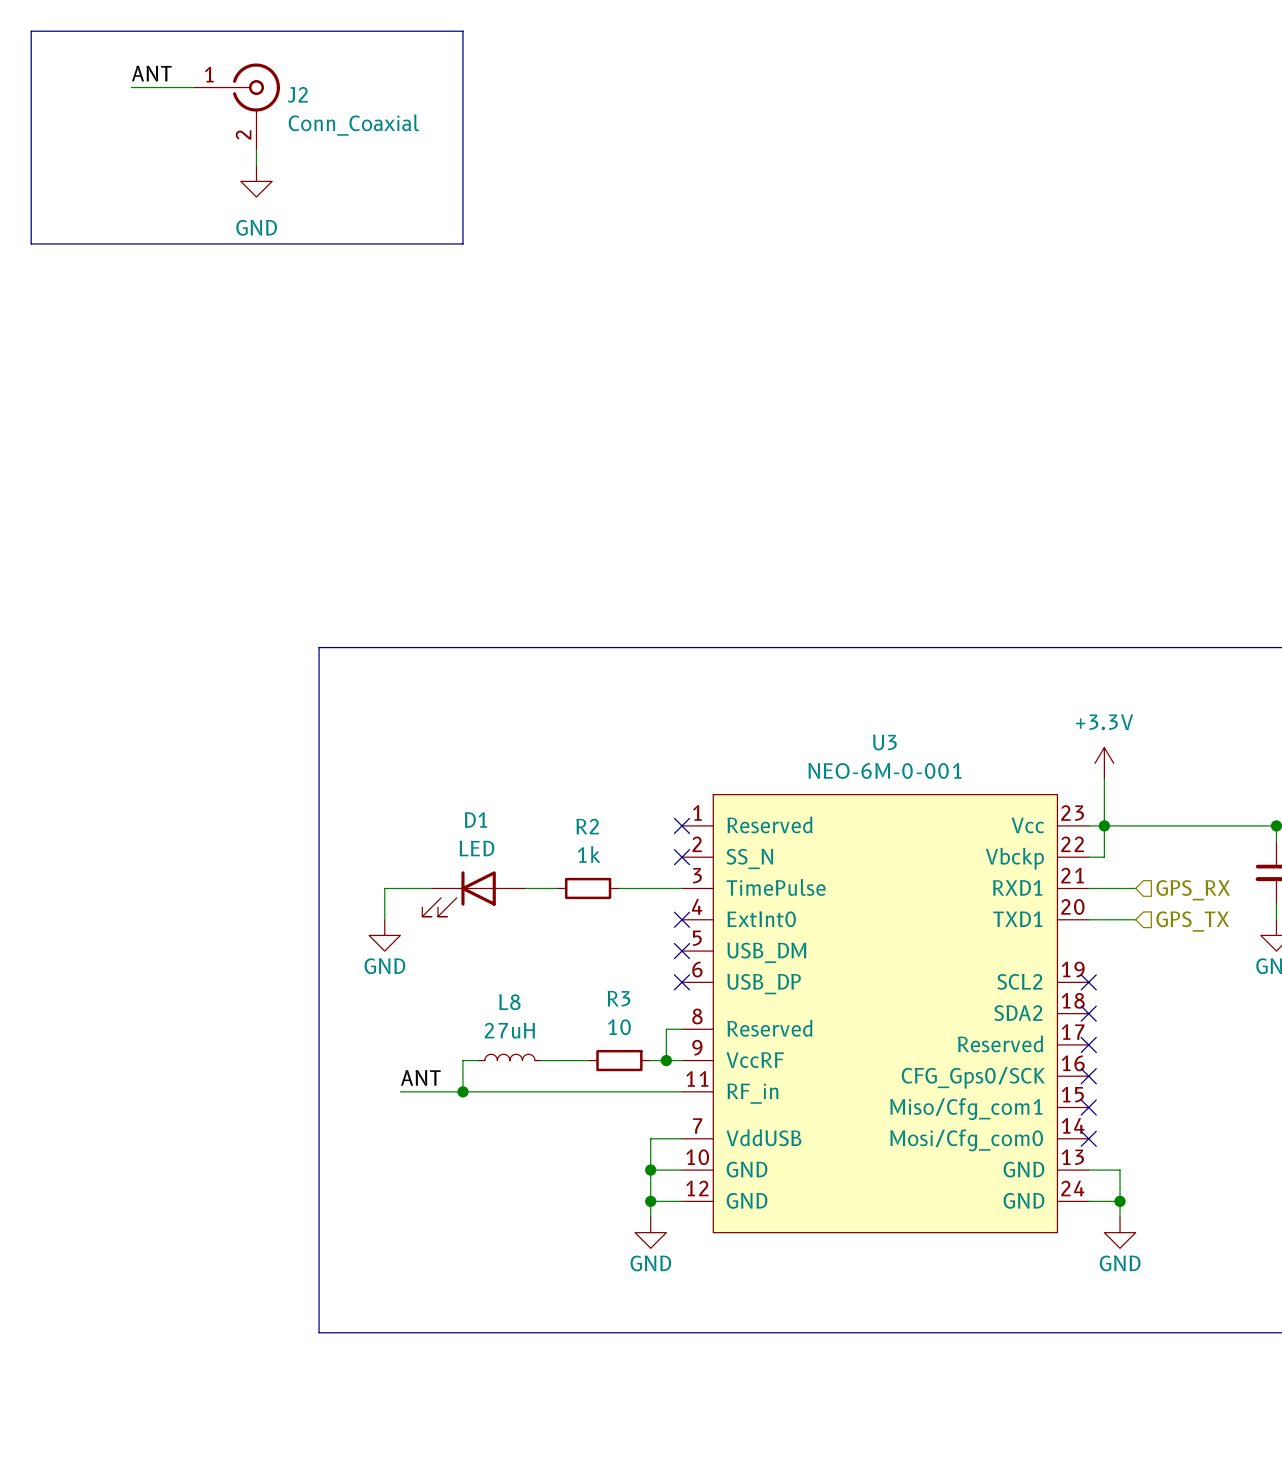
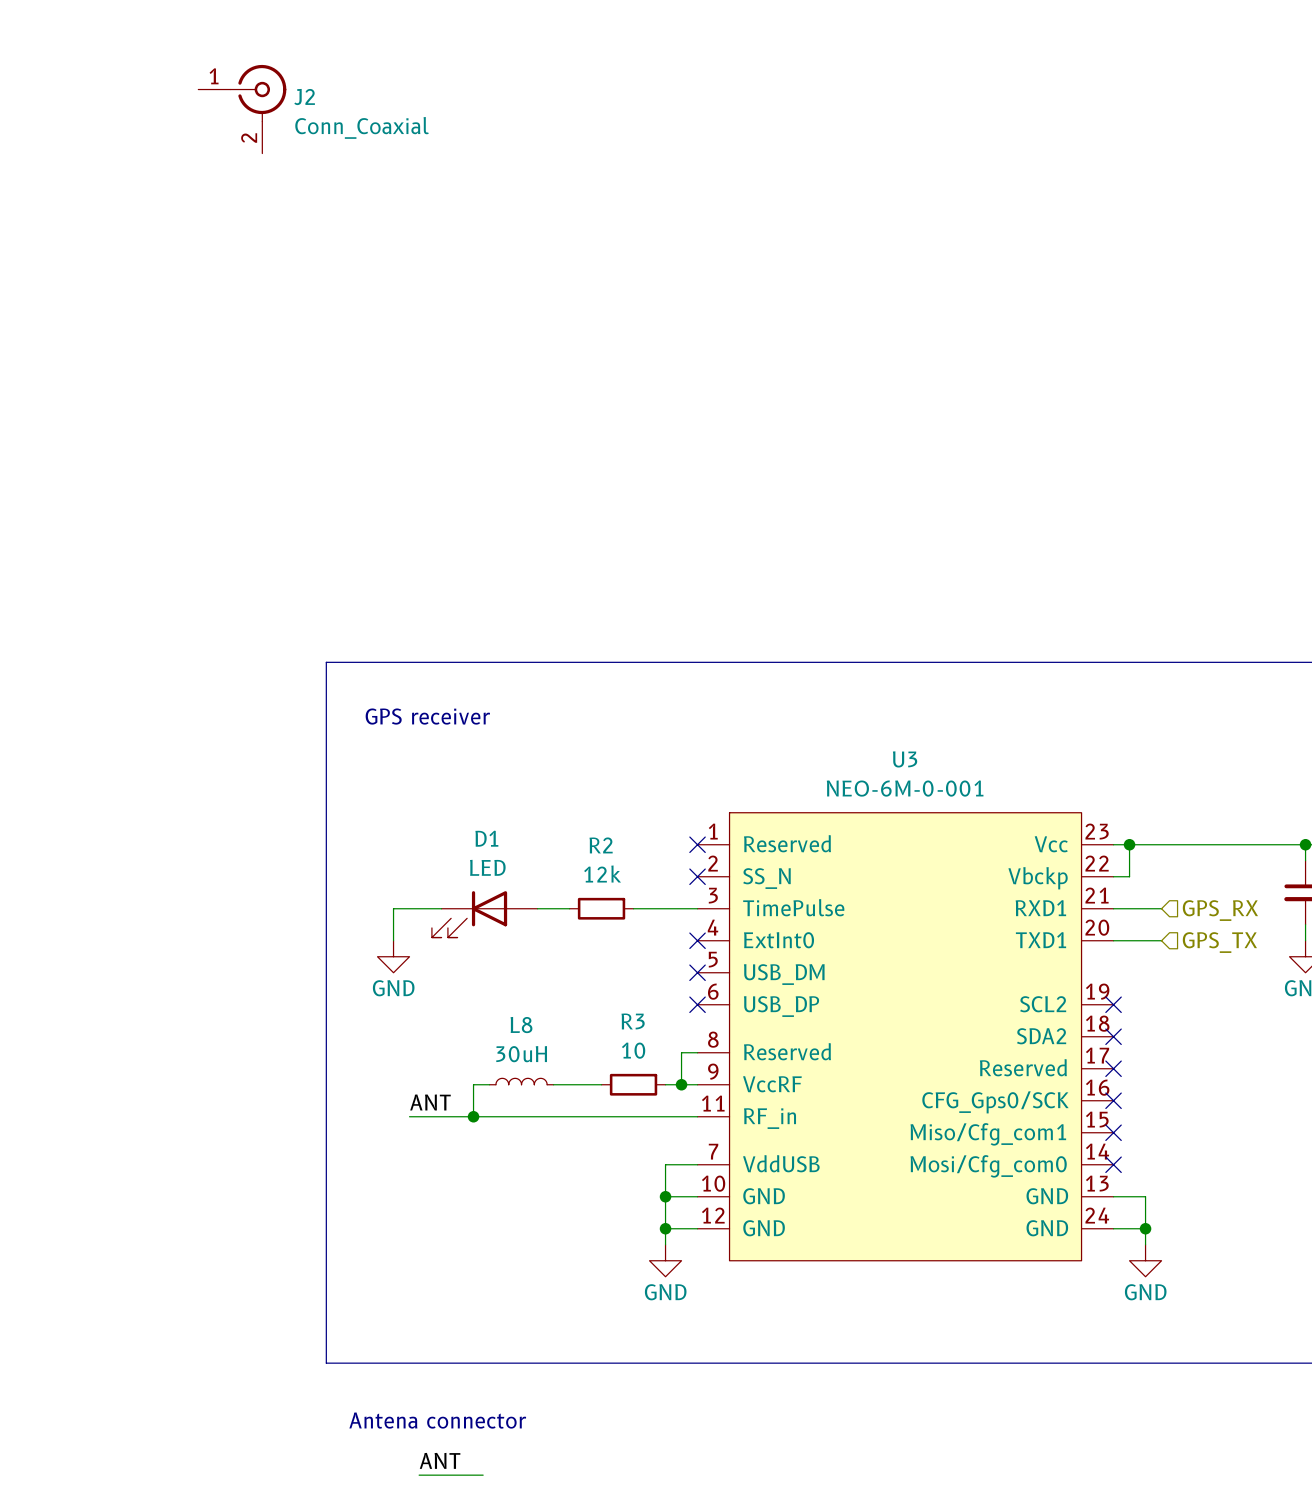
line: (31, 31) (31, 243) (462, 243) (462, 31) (31, 31) -> none
label: ANT (151, 73) -> none
wire: (131, 87) (193, 87) -> none
wire: (256, 150) (256, 165) -> none
power symbol: GND (256, 181) -> none
text: none -> GPS receiver (427, 716)
power symbol: +3.3V (1104, 763) -> none
wire: (1104, 778) (1104, 825) -> none
R2 value: 1k (589, 854) -> 12k (602, 874)
L8 value: 27uH (509, 1030) -> 30uH (521, 1054)
text: none -> Antena connector (437, 1420)
label: none -> ANT (440, 1460)
wire: none -> (419, 1475) (483, 1475)

